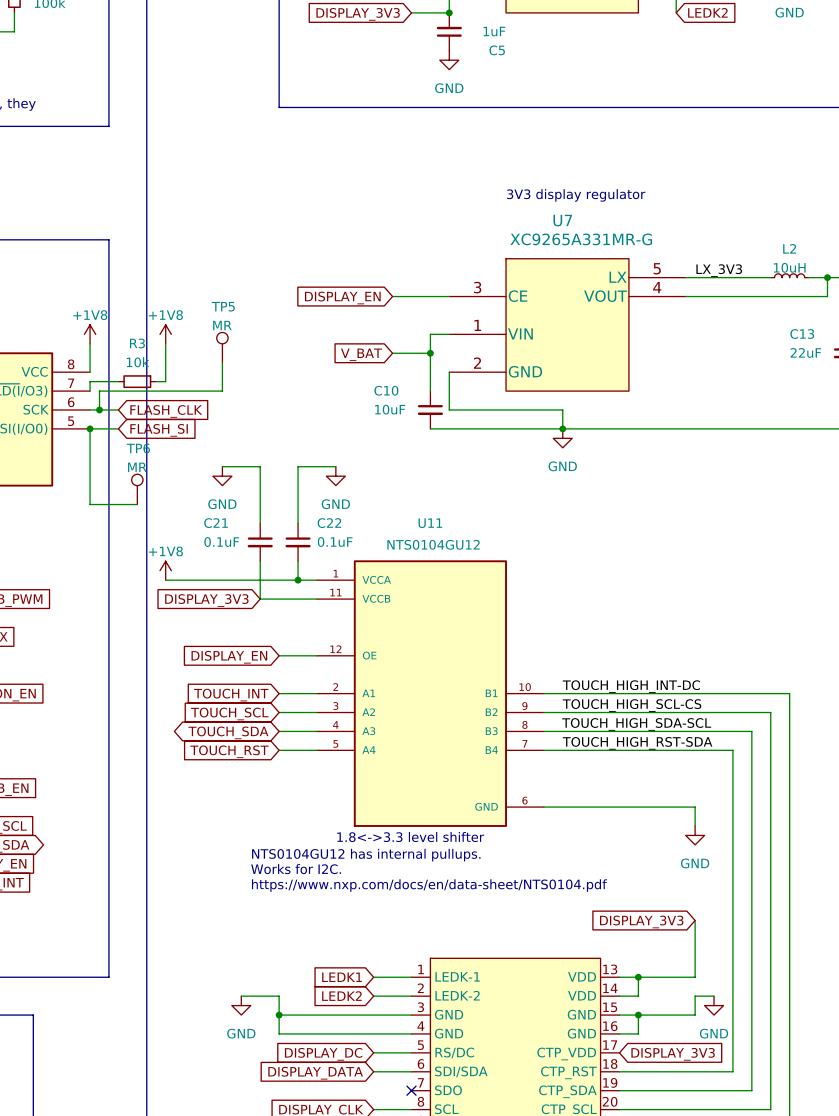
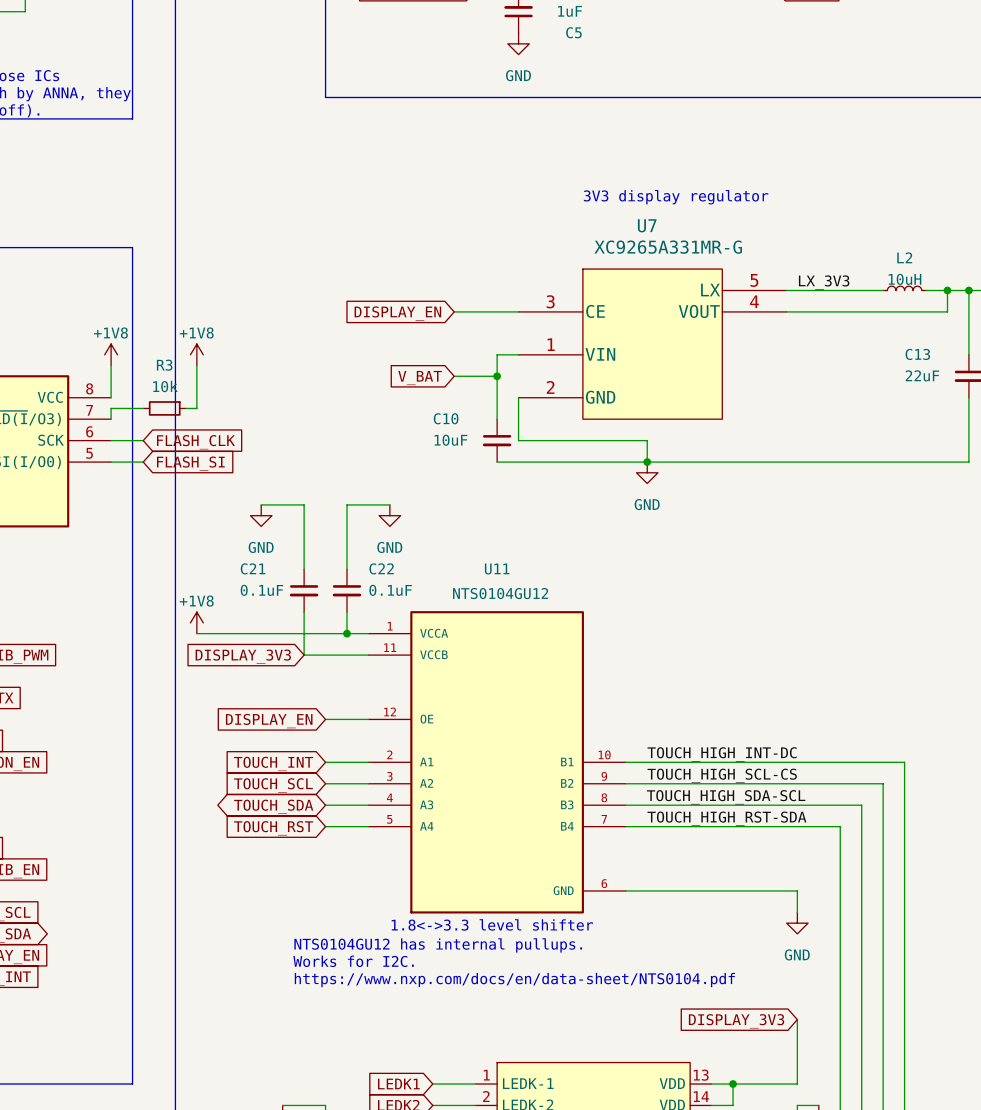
TP5: MR (222, 347) -> none
wire: (222, 362) (222, 391) (99, 391) (99, 409) -> none
junction: (99, 409) -> none
wire: (90, 428) (90, 504) (137, 504) -> none
junction: (90, 428) -> none
TP6: MR (137, 489) -> none

